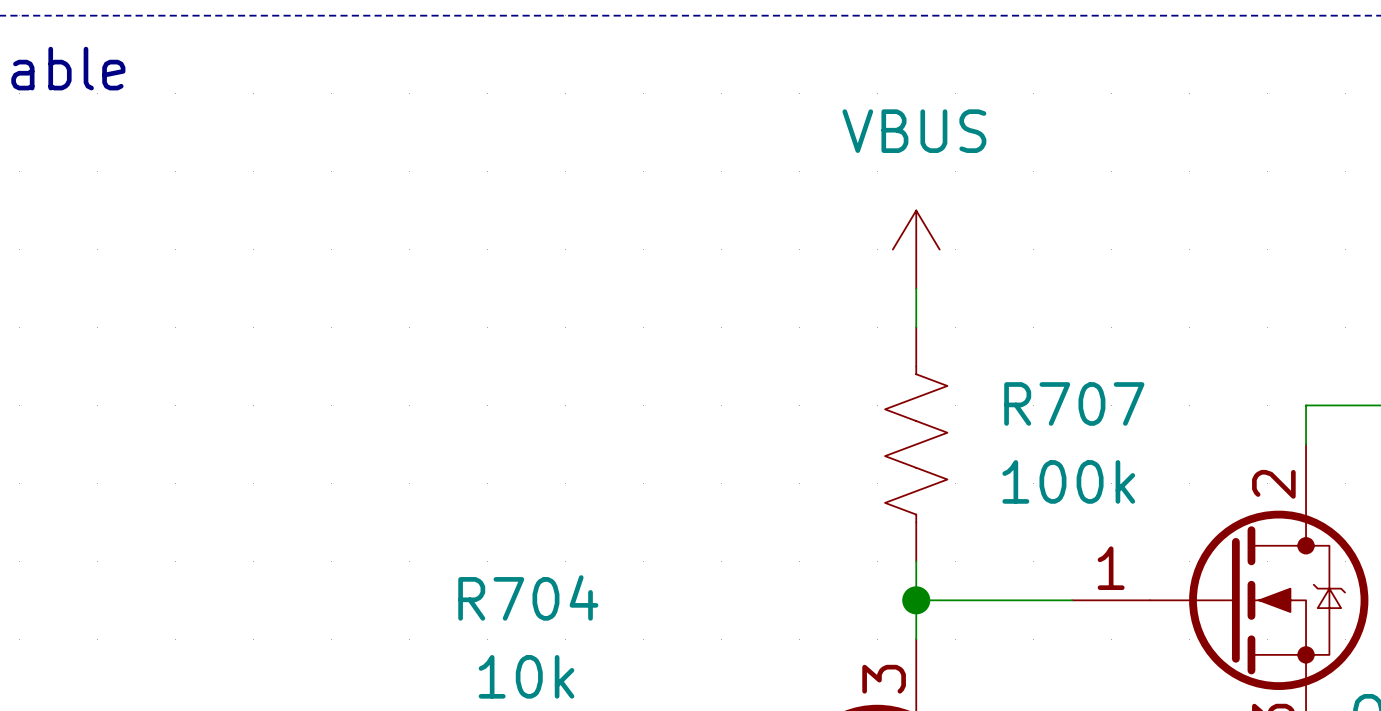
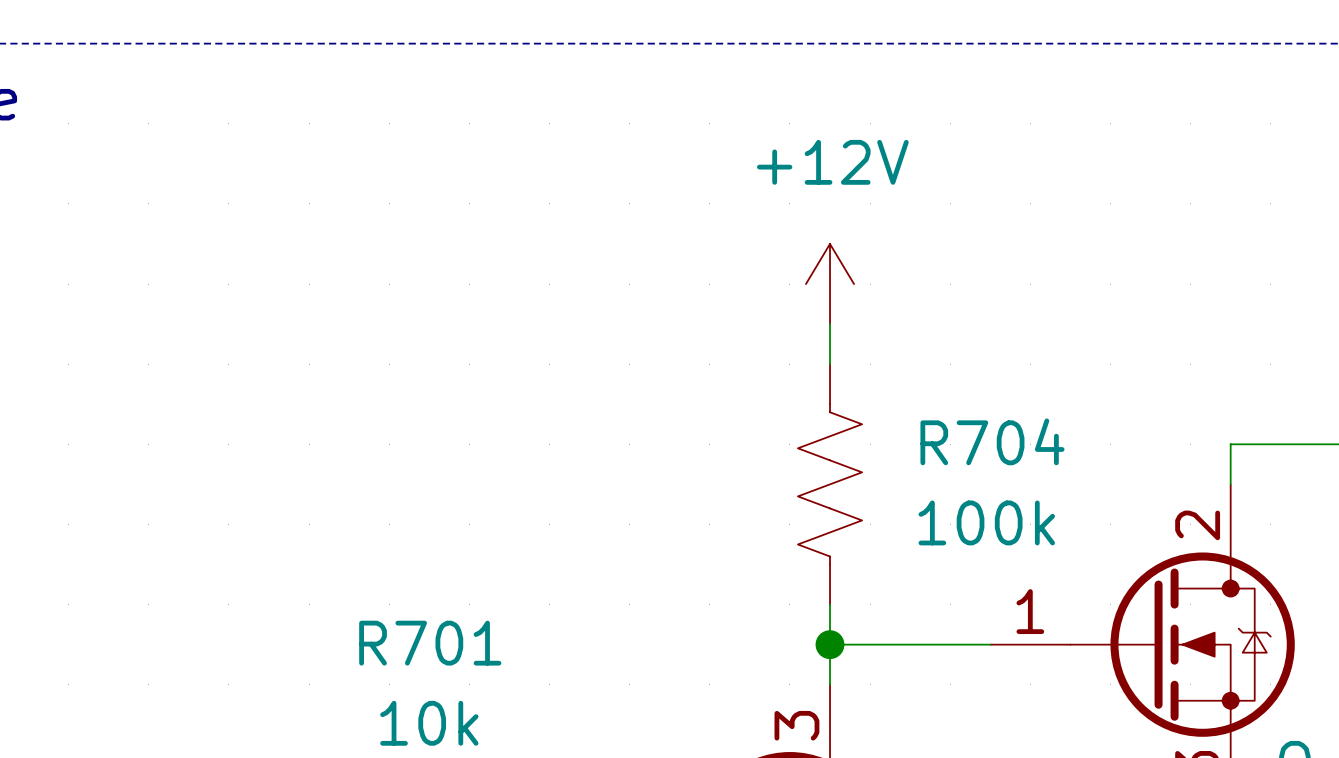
power symbol: VBUS (916, 249) -> +12V (830, 284)
R707 name: R707 (1074, 403) -> R704 (992, 441)
R704 name: R704 (528, 597) -> R701 (430, 643)

